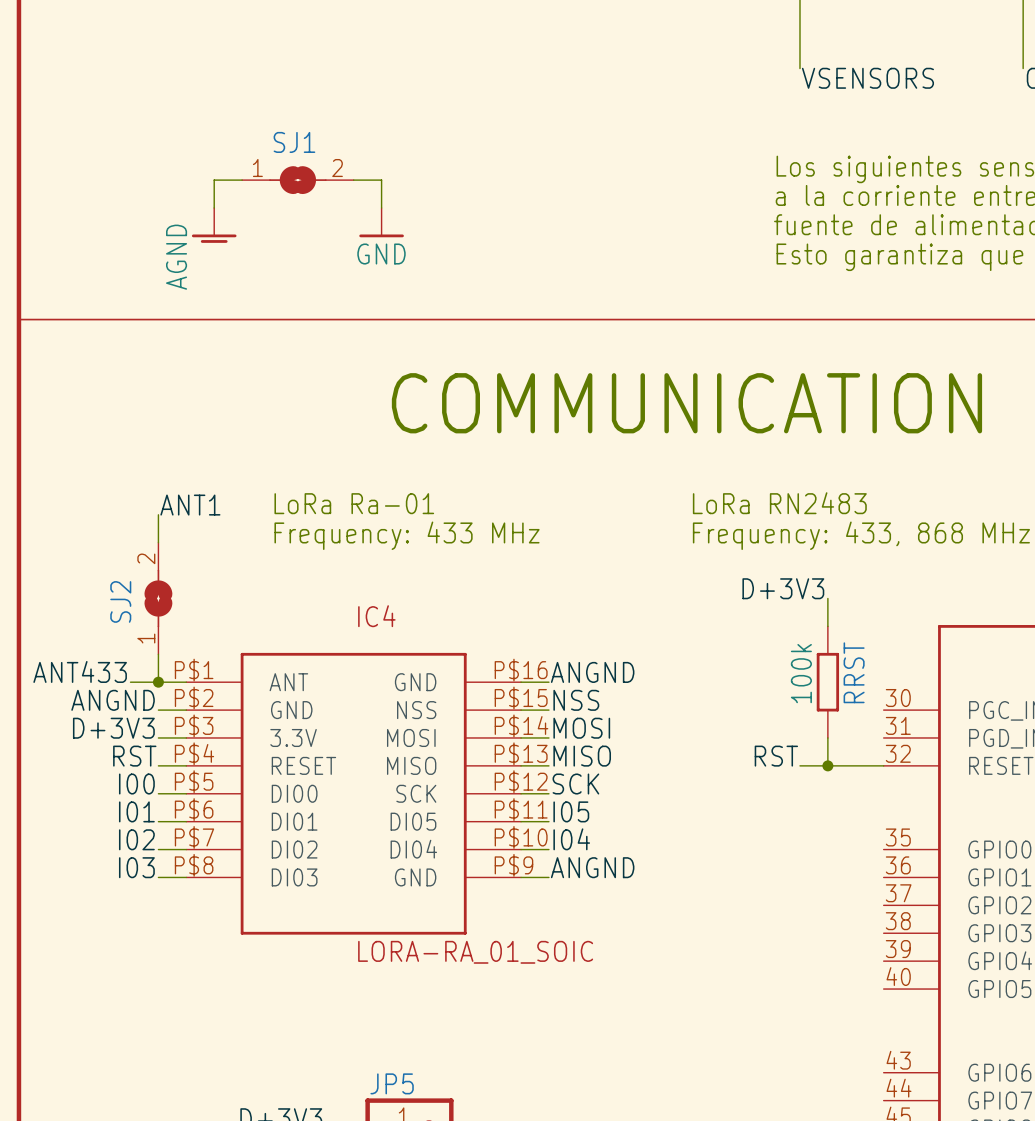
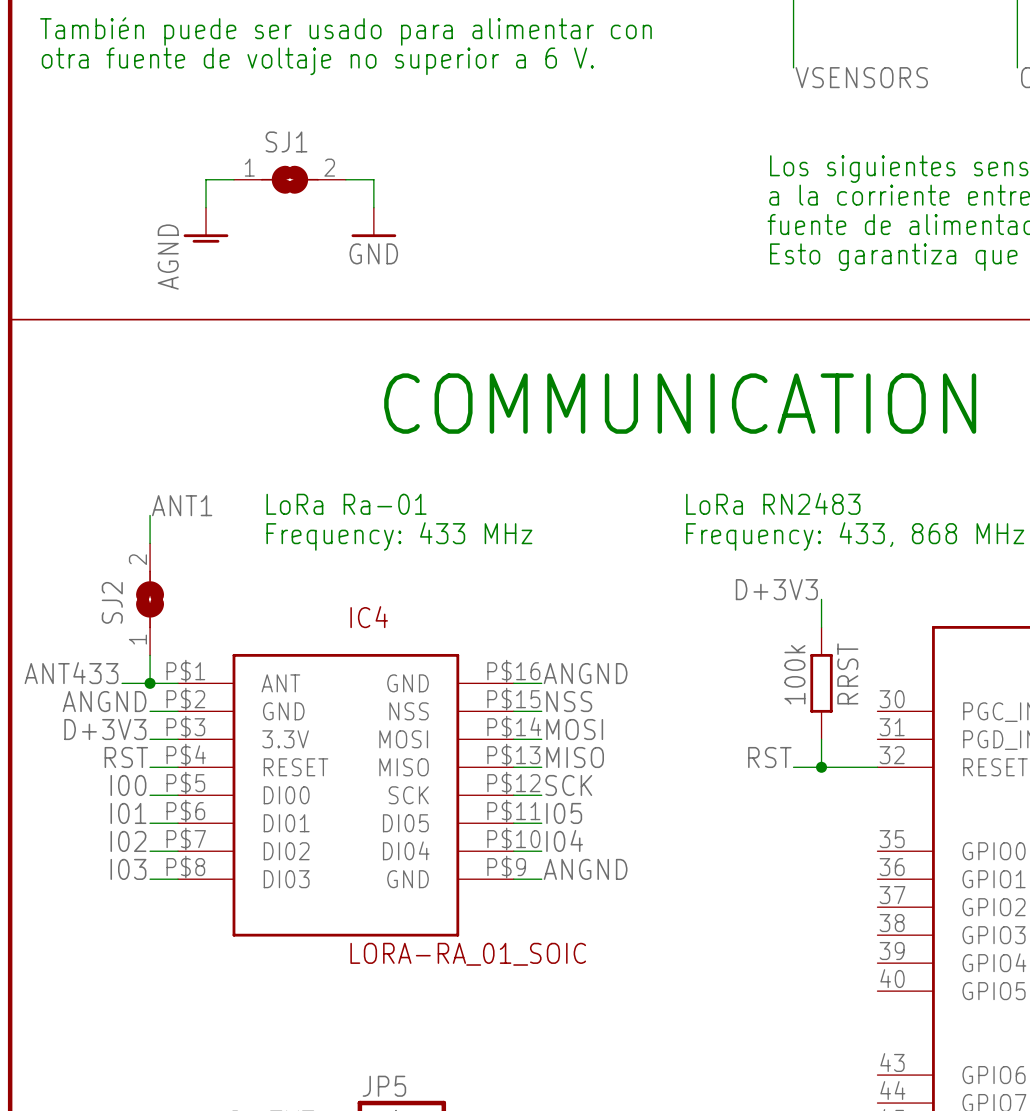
text: none -> También puede ser usado para alimentar con (345, 31)
text: none -> otra fuente de voltaje no superior a 6 V. (317, 61)

